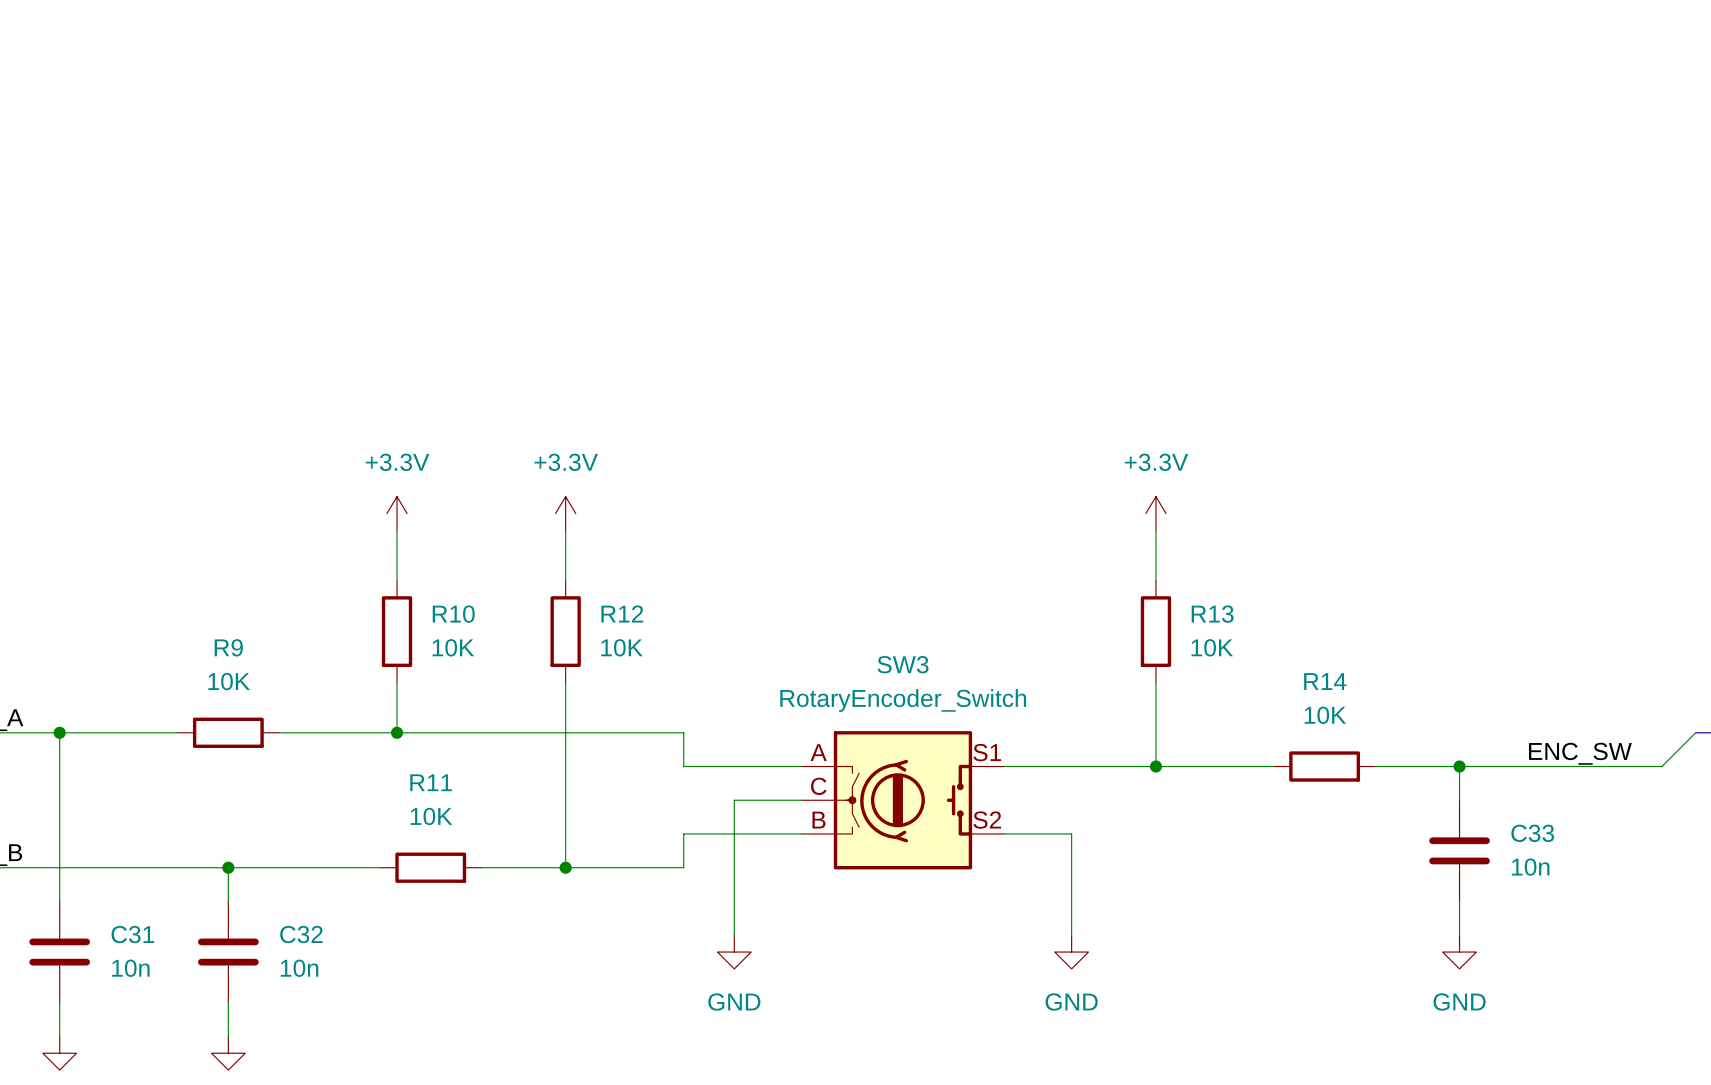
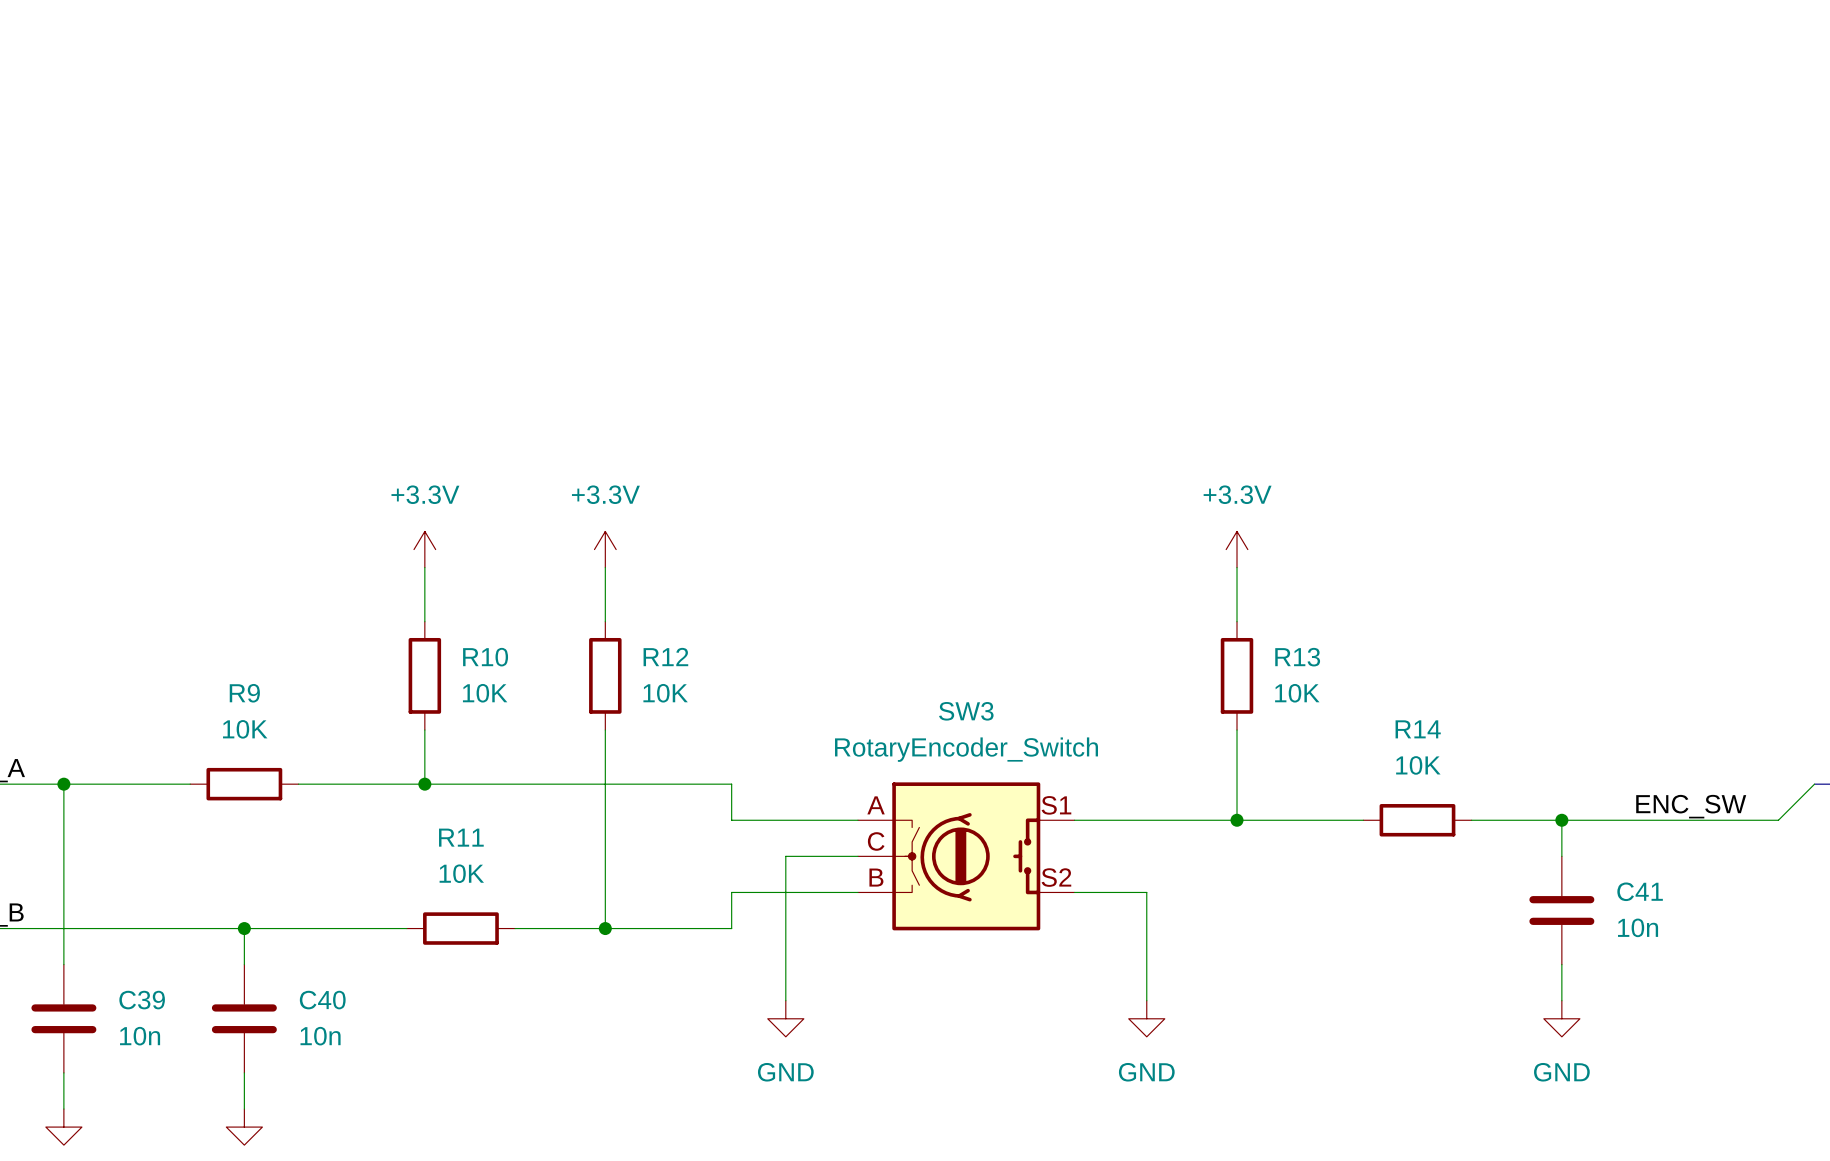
C33 name: C33 (1532, 833) -> C41 (1640, 891)
C31 name: C31 (132, 934) -> C39 (142, 1000)
C32 name: C32 (301, 934) -> C40 (322, 1000)

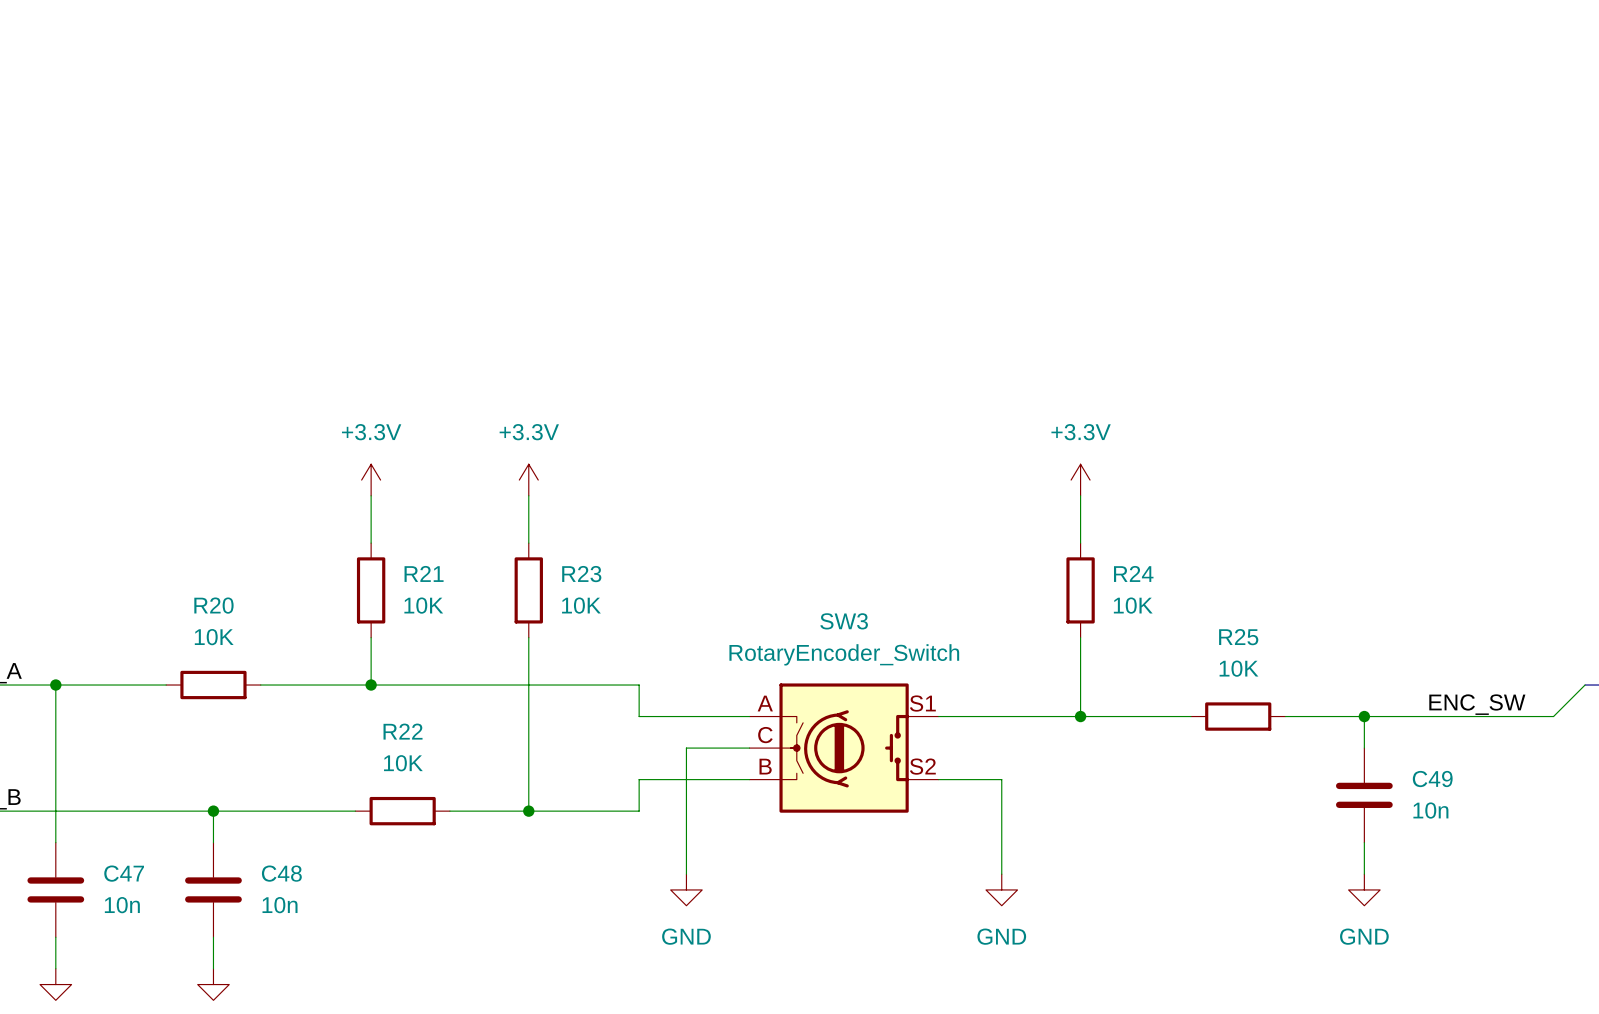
R10 name: R10 (485, 657) -> R21 (424, 573)
R12 name: R12 (665, 657) -> R23 (581, 574)
R13 name: R13 (1297, 657) -> R24 (1133, 573)
R9 name: R9 (244, 693) -> R20 (213, 605)
R14 name: R14 (1418, 729) -> R25 (1238, 637)
R11 name: R11 (461, 837) -> R22 (403, 731)
C41 name: C41 (1640, 891) -> C49 (1432, 779)
C39 name: C39 (142, 1000) -> C47 (124, 873)
C40 name: C40 (322, 1000) -> C48 (281, 873)

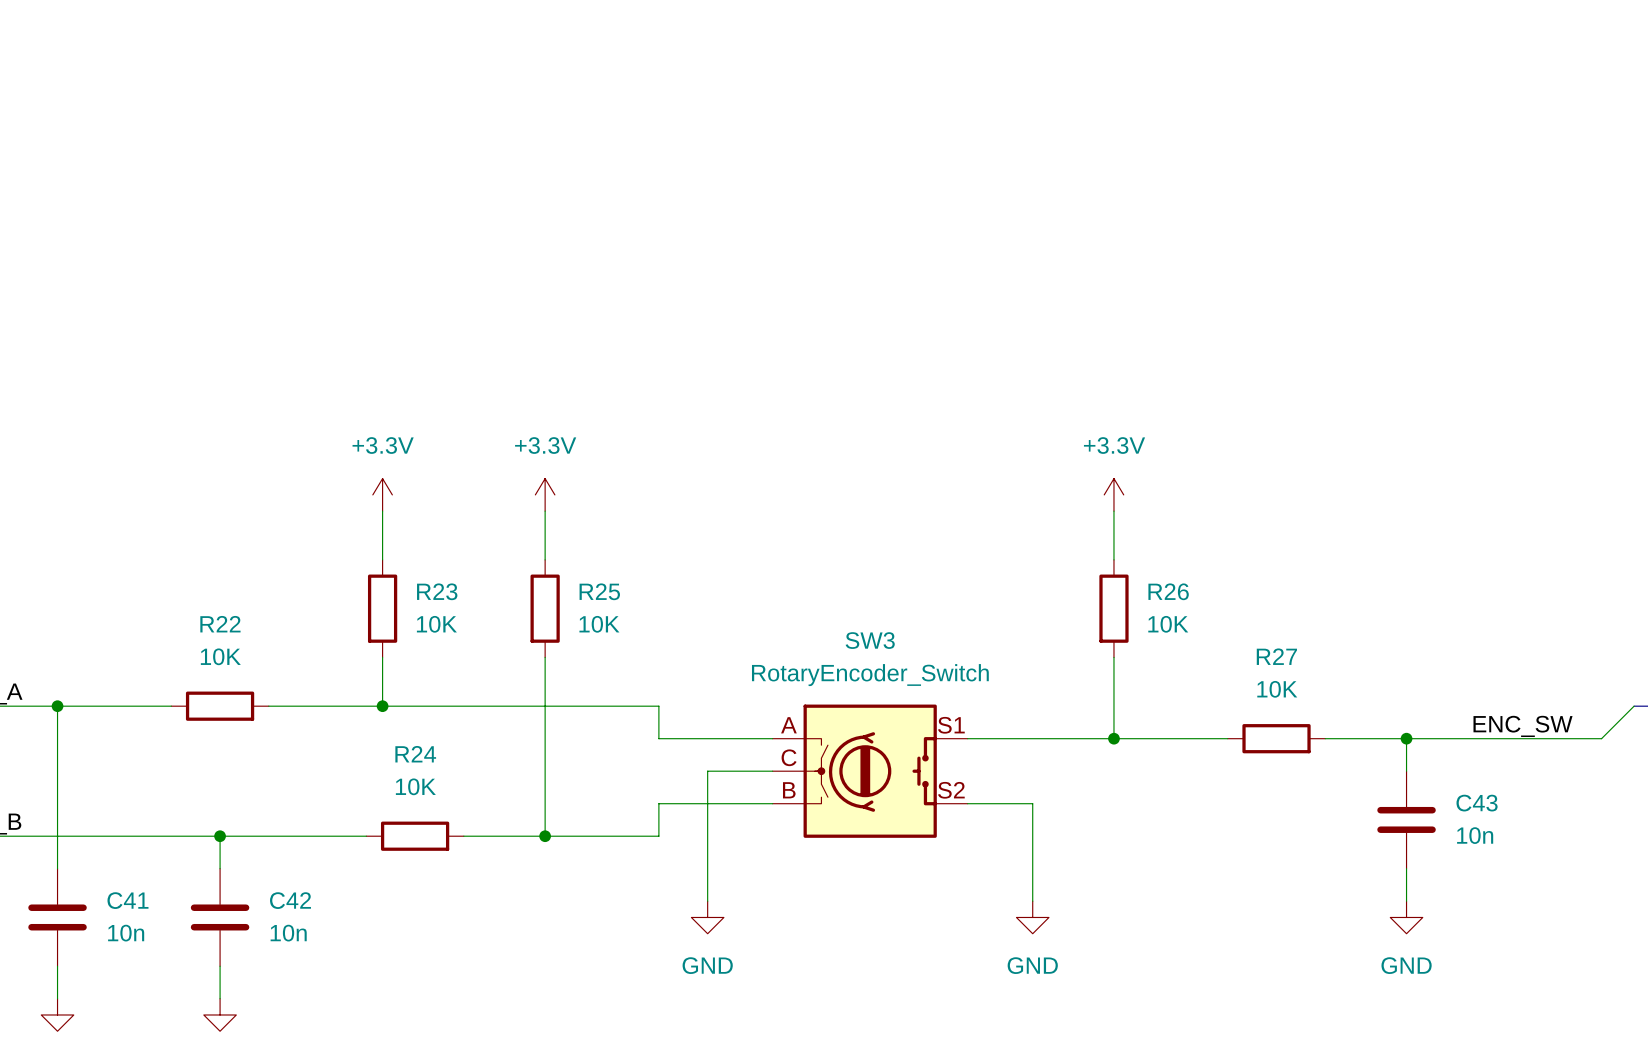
R21 name: R21 (424, 573) -> R23 (437, 591)
R24 name: R24 (1133, 573) -> R26 (1168, 591)
R23 name: R23 (581, 574) -> R25 (599, 591)
R20 name: R20 (213, 605) -> R22 (220, 624)
R25 name: R25 (1238, 637) -> R27 (1276, 656)
R22 name: R22 (403, 731) -> R24 (415, 754)
C49 name: C49 (1432, 779) -> C43 (1477, 803)
C47 name: C47 (124, 873) -> C41 (127, 900)
C48 name: C48 (281, 873) -> C42 (290, 900)

